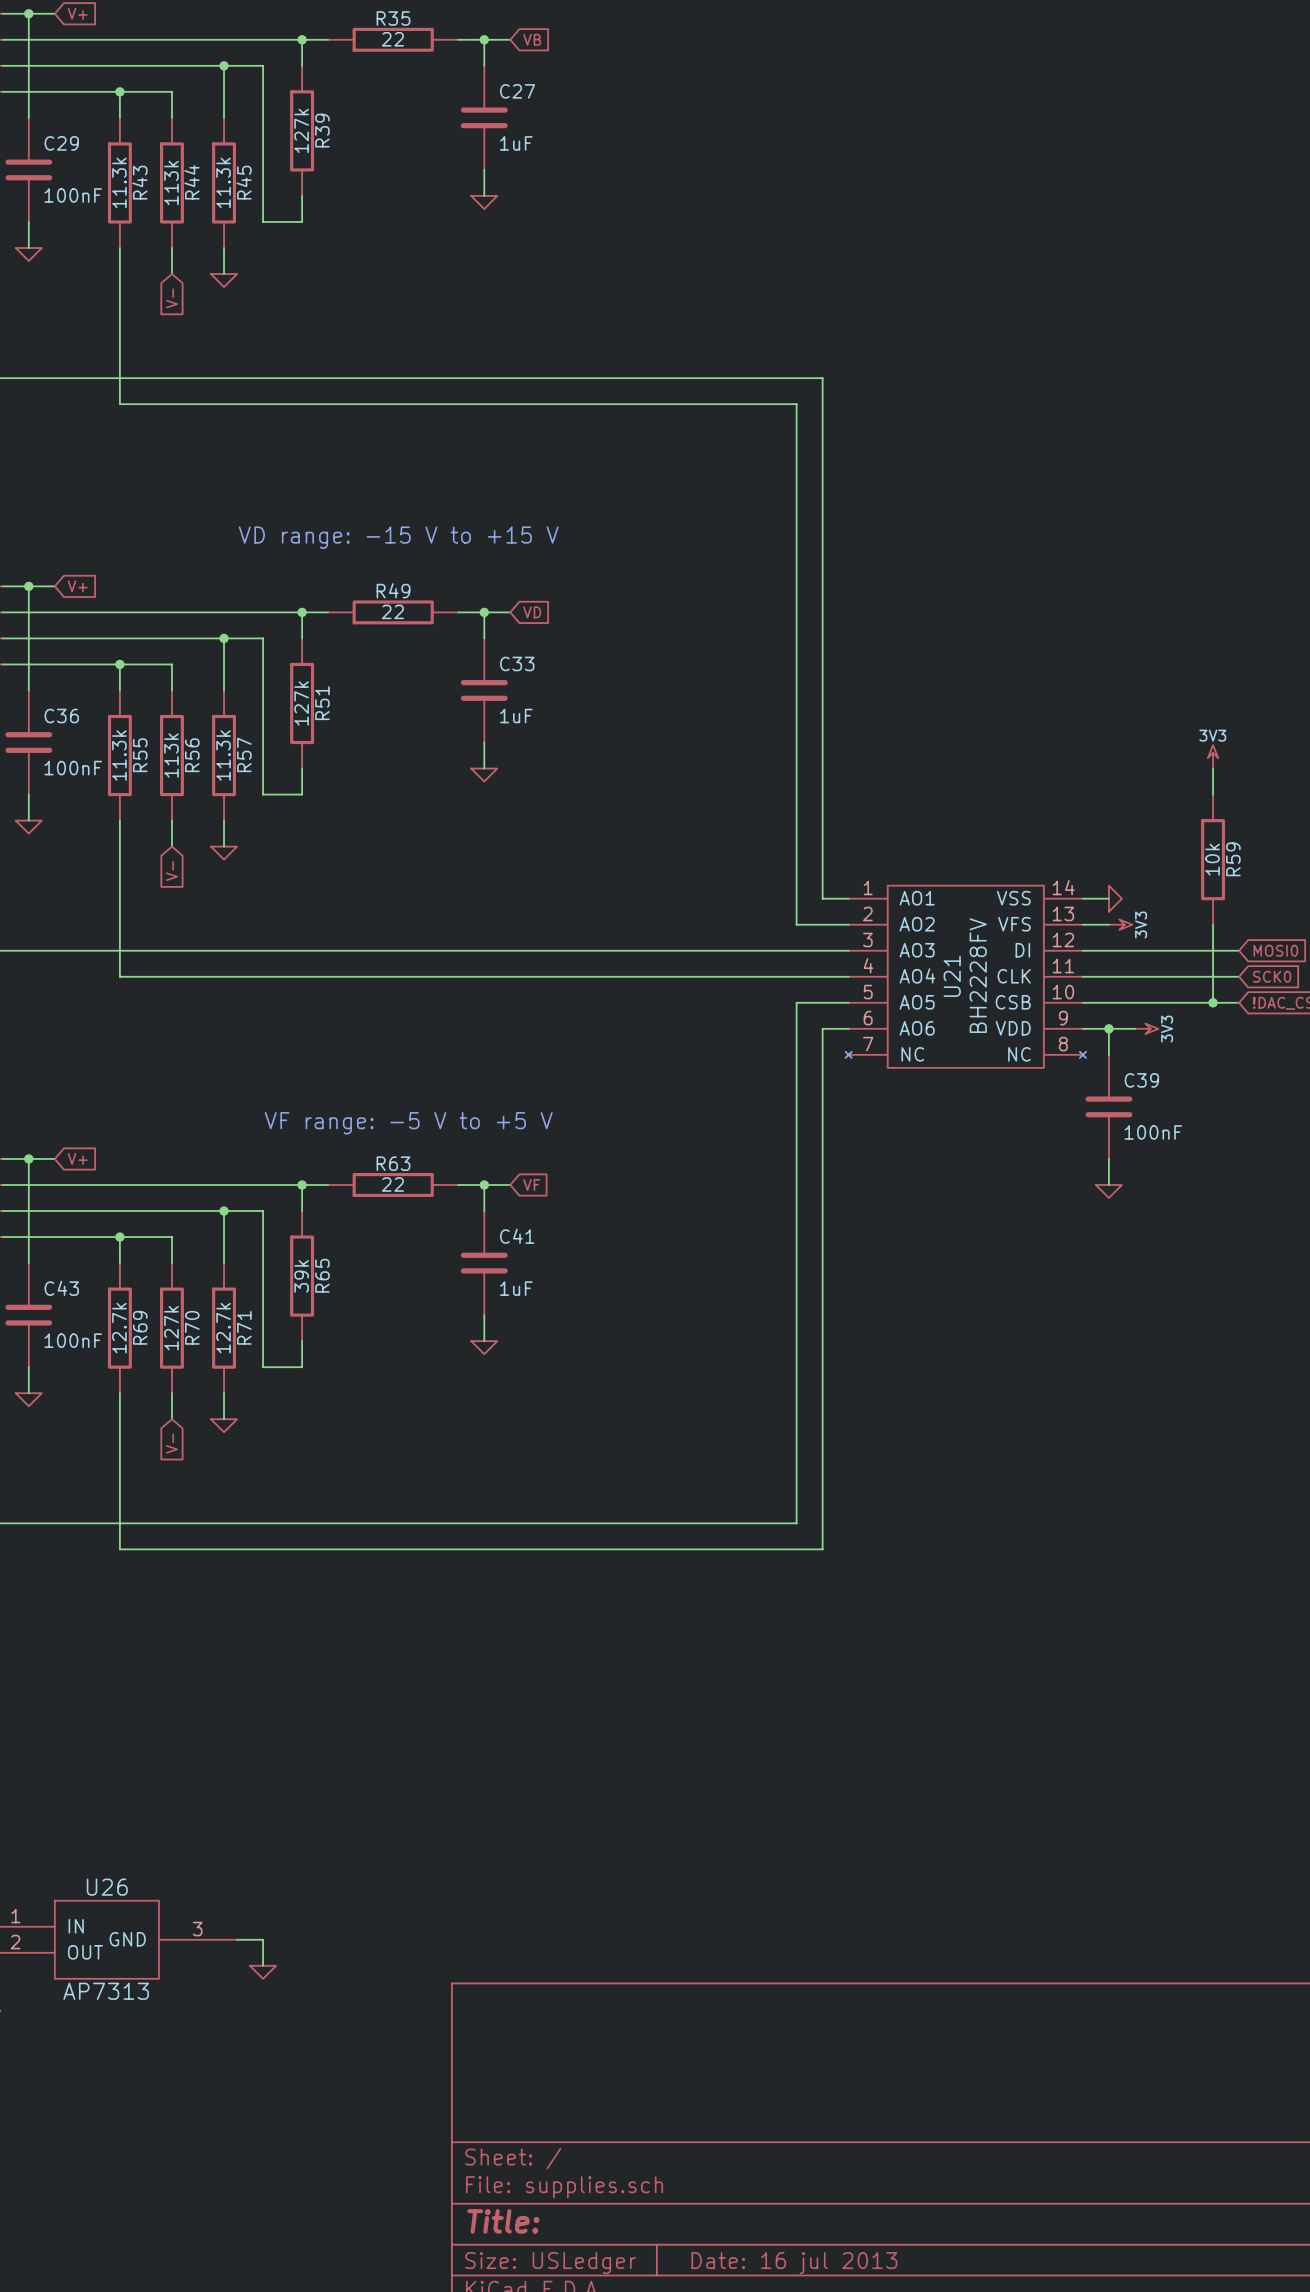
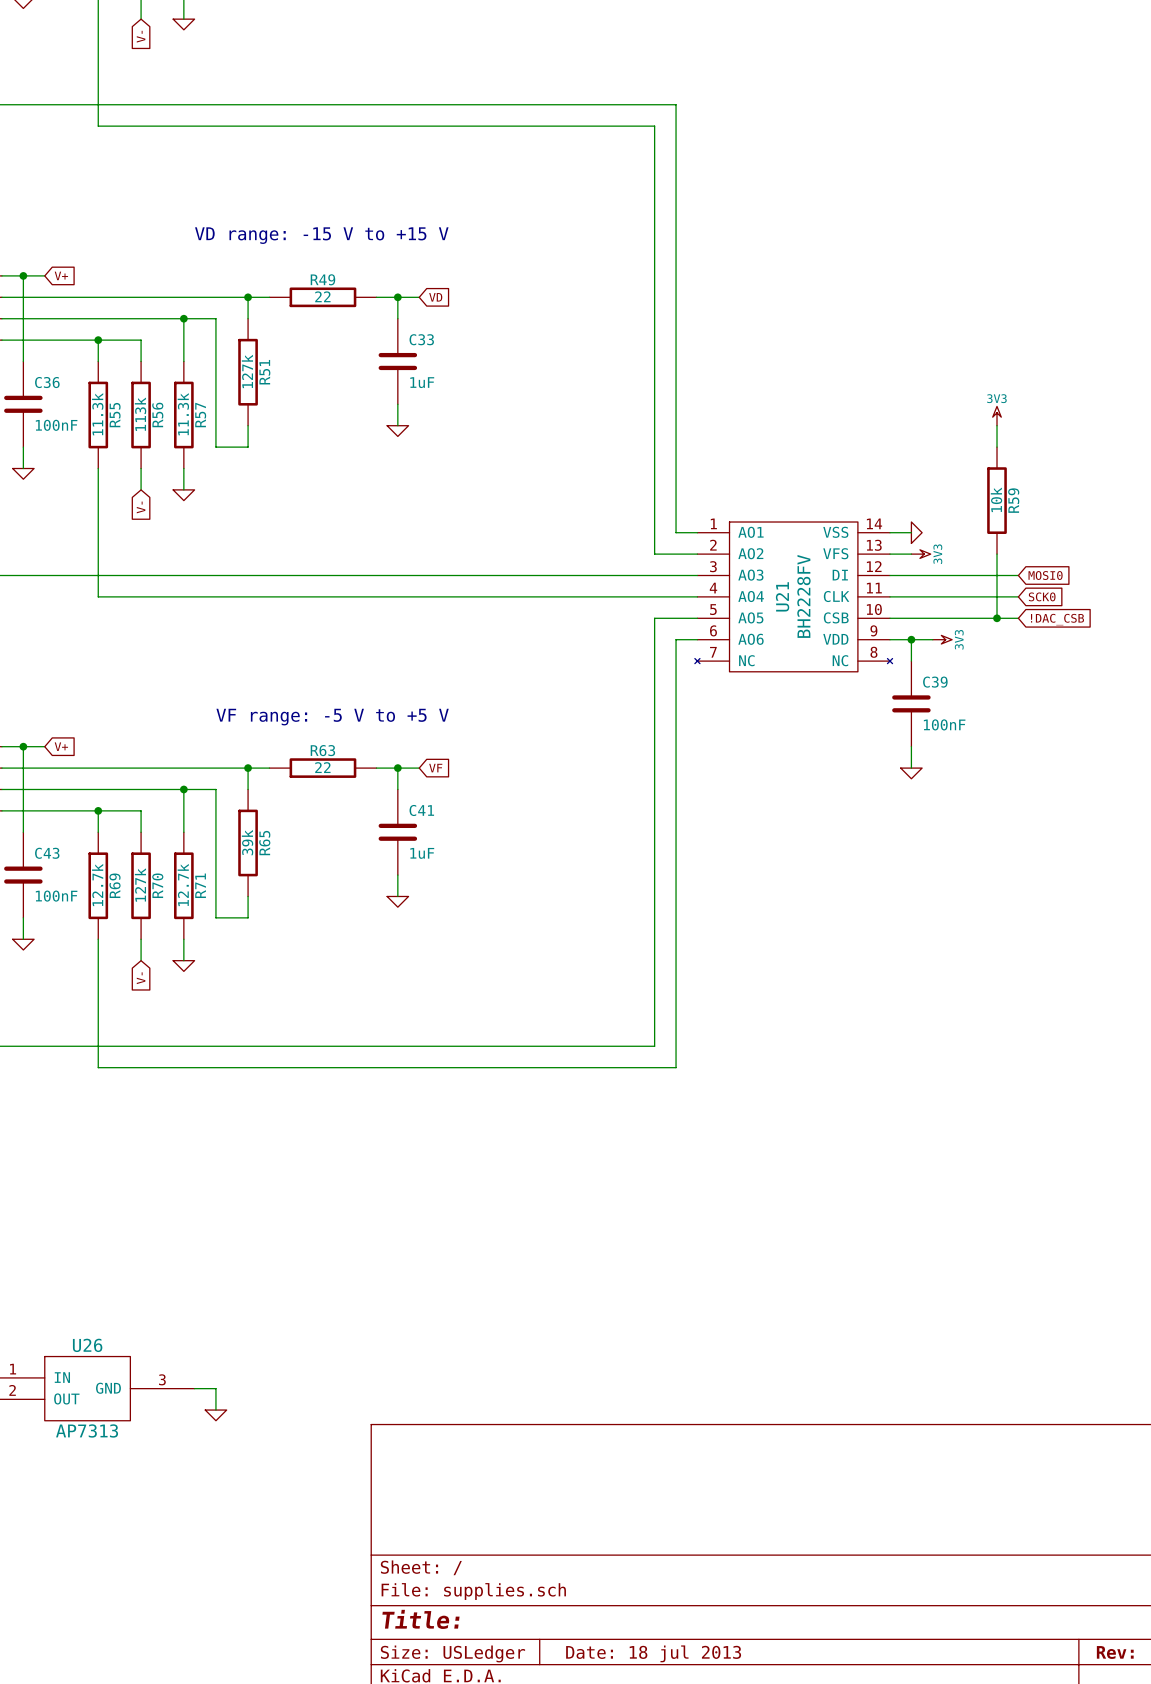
title block: Date: 16 jul 2013 (794, 2263) -> Date: 18 jul 2013 (653, 1653)

